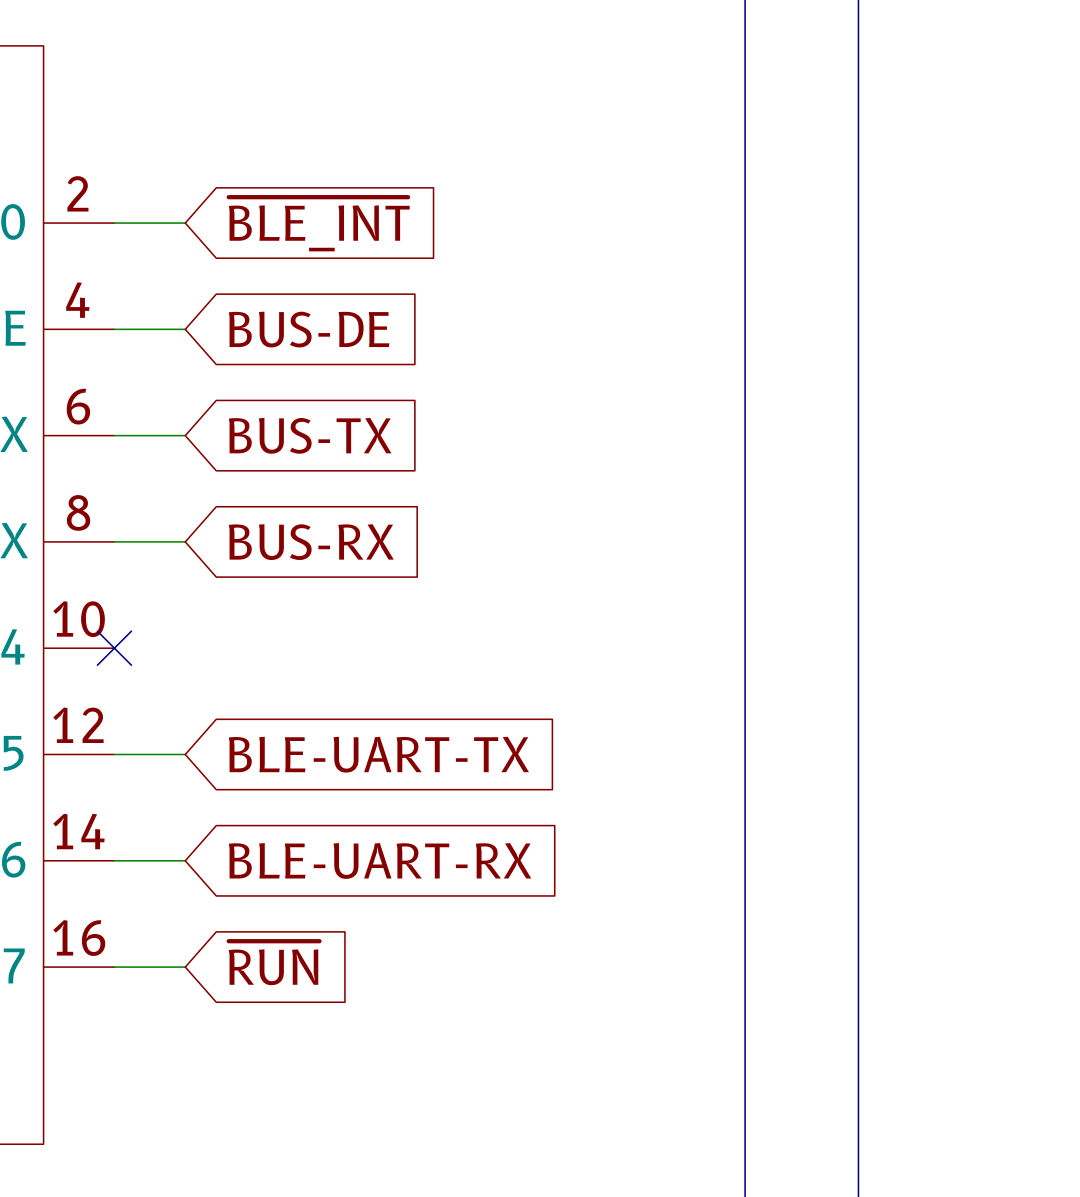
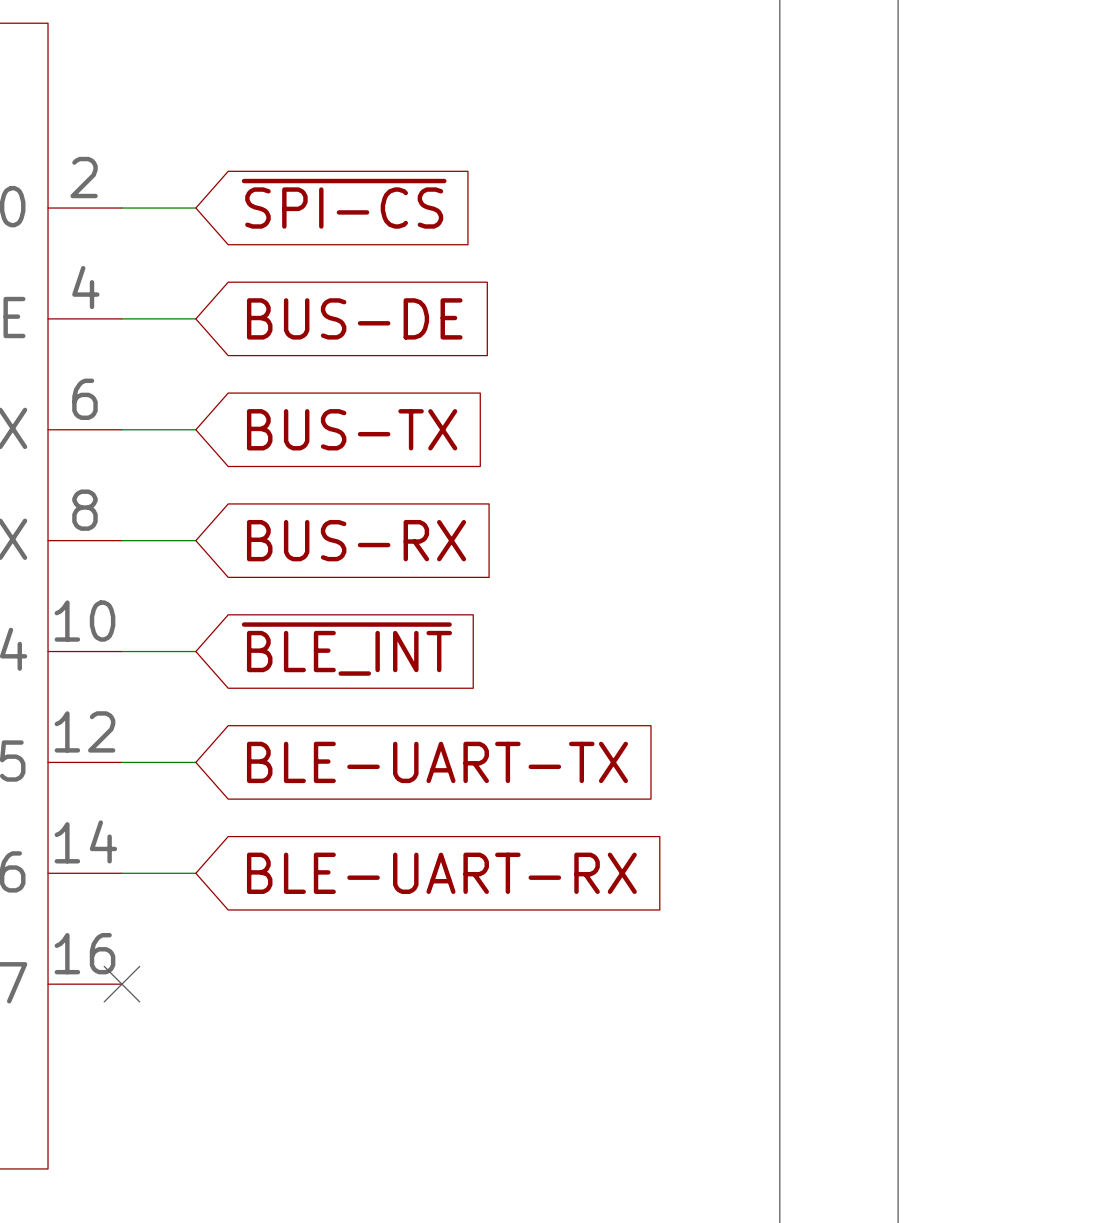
global label: ~{BLE_INT} (319, 224) -> ~{SPI-CS} (344, 203)
no-connect mark: (114, 648) -> none
global label: none -> ~{BLE_INT} (346, 649)
global label: ~{RUN} (274, 963) -> none
wire: (114, 967) (185, 967) -> (121, 651) (195, 651)
no-connect mark: none -> (121, 984)

